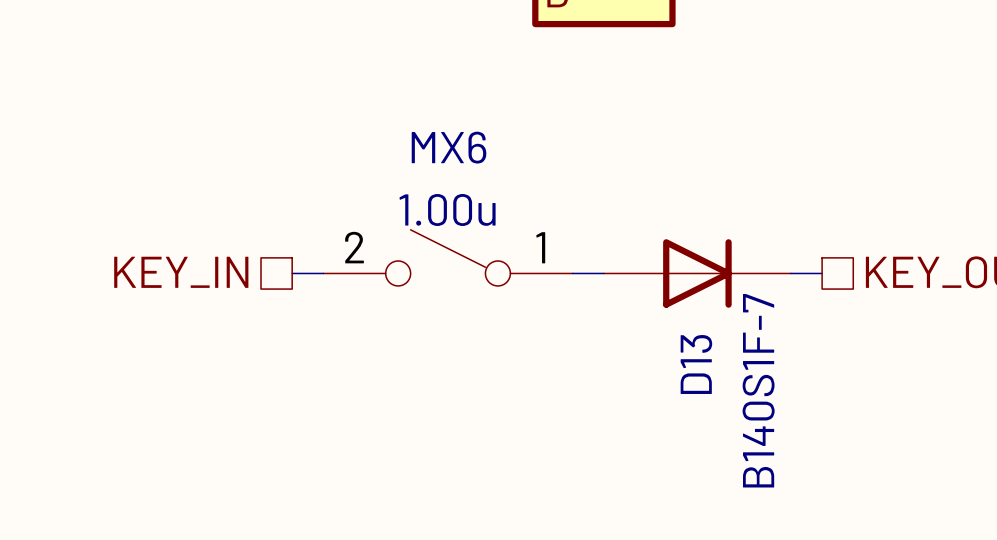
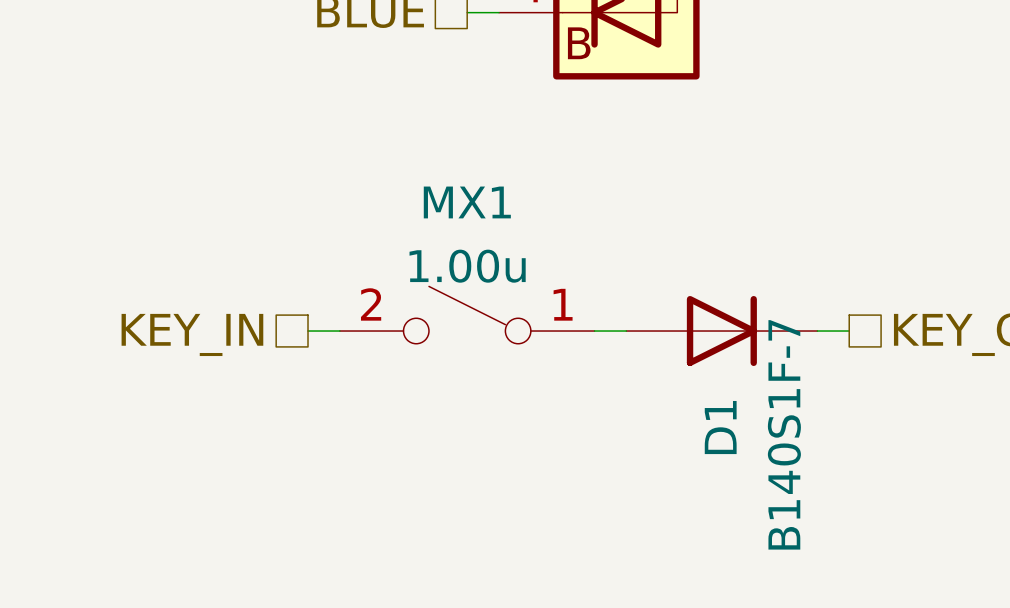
MX6 name: MX6 (449, 147) -> MX1 (467, 202)
D13 name: D13 (696, 364) -> D1 (720, 427)

